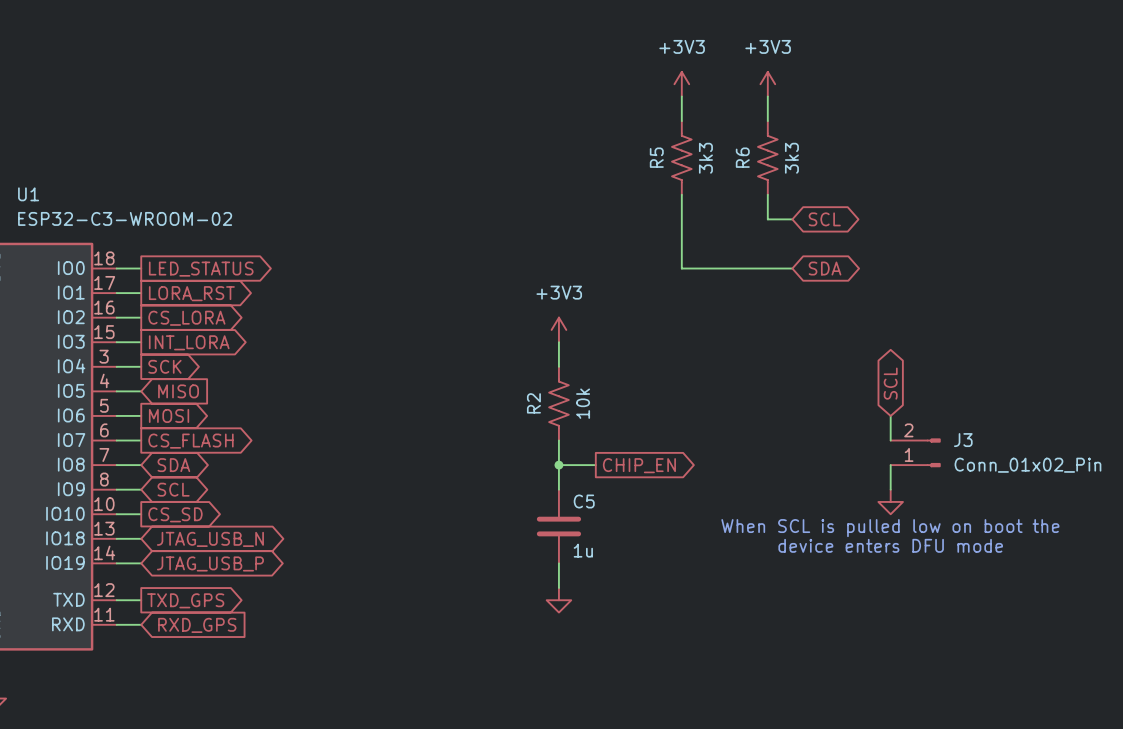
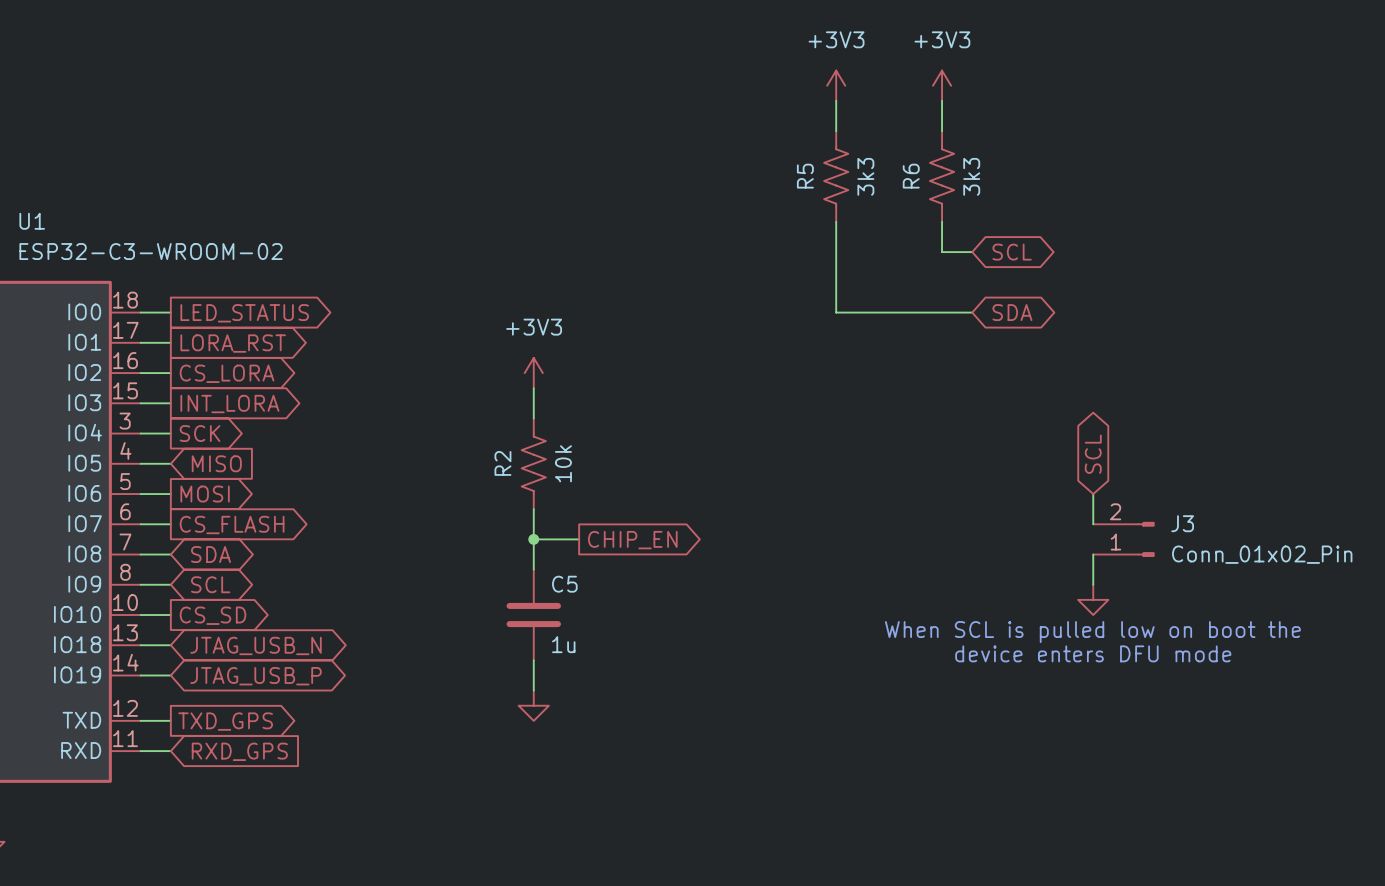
power symbol position: +3V3 (558, 329) -> +3V3 (533, 373)
wire: (558, 342) (558, 366) -> (533, 388) (533, 418)
R2 position: (558, 403) -> (533, 463)
wire: (558, 440) (558, 489) -> (533, 509) (533, 569)
junction: none -> (533, 539)
wire: (558, 465) (595, 465) -> (533, 539) (579, 539)
junction: (558, 465) -> none
global label position: CHIP_EN (639, 465) -> CHIP_EN (632, 540)
C5 position: (558, 526) -> (533, 615)
wire: (558, 563) (558, 587) -> (533, 660) (533, 690)
power symbol position: (558, 600) -> (533, 705)

